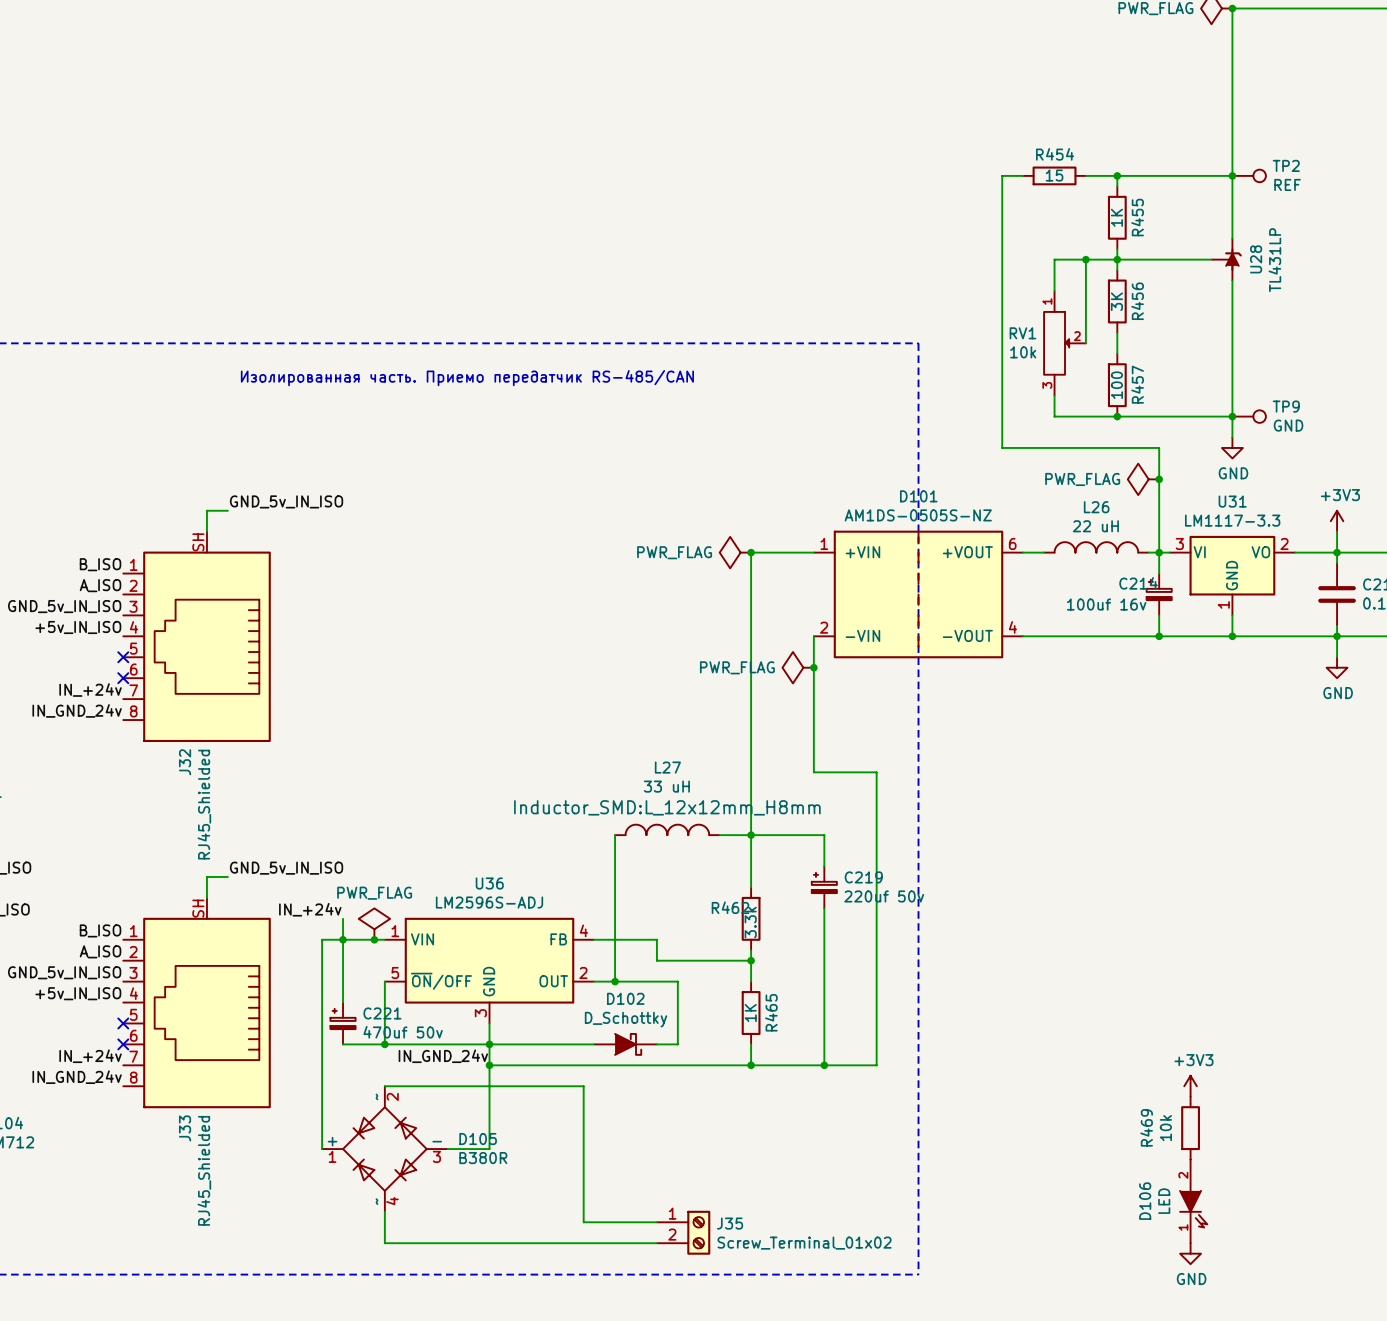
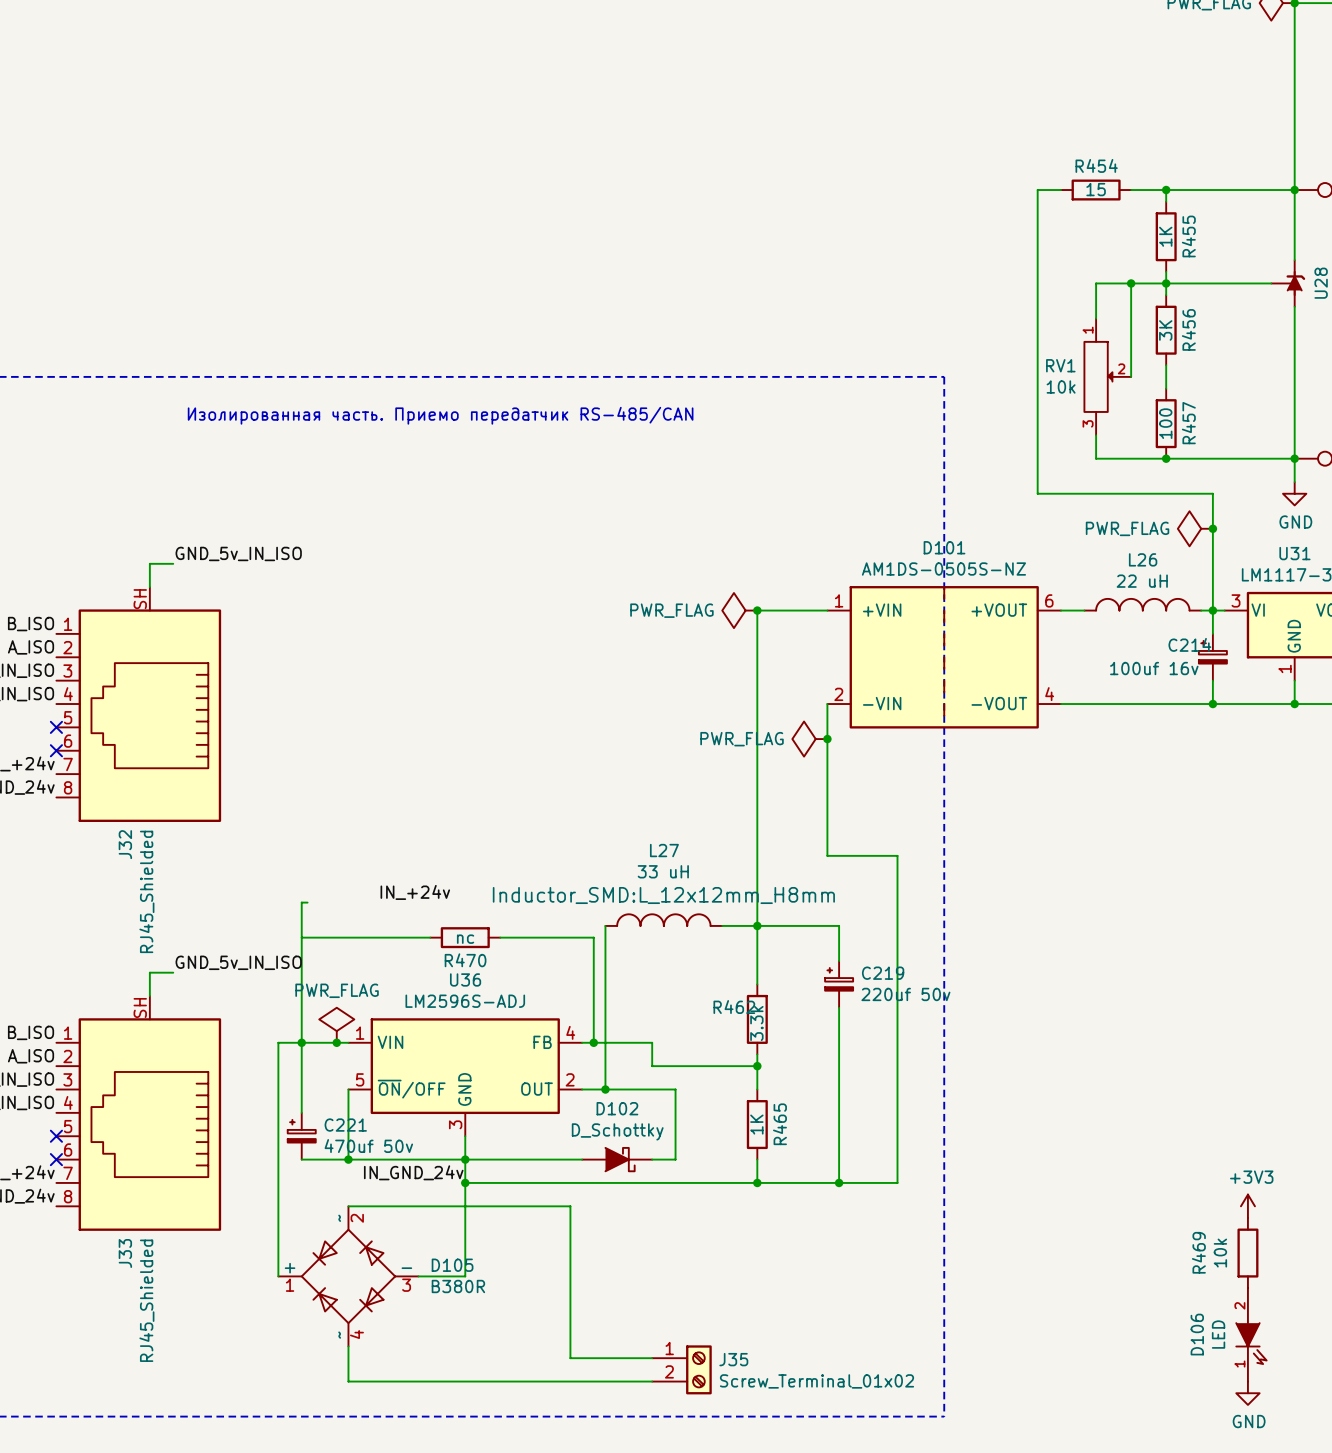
wire: none -> (307, 902) (301, 902) (301, 1019)
wire: none -> (301, 937) (430, 937)
R470: none -> nc (465, 937)
wire: none -> (500, 937) (593, 937) (593, 1042)
label position: IN_+24v (310, 909) -> IN_+24v (415, 892)
junction: none -> (593, 1042)

